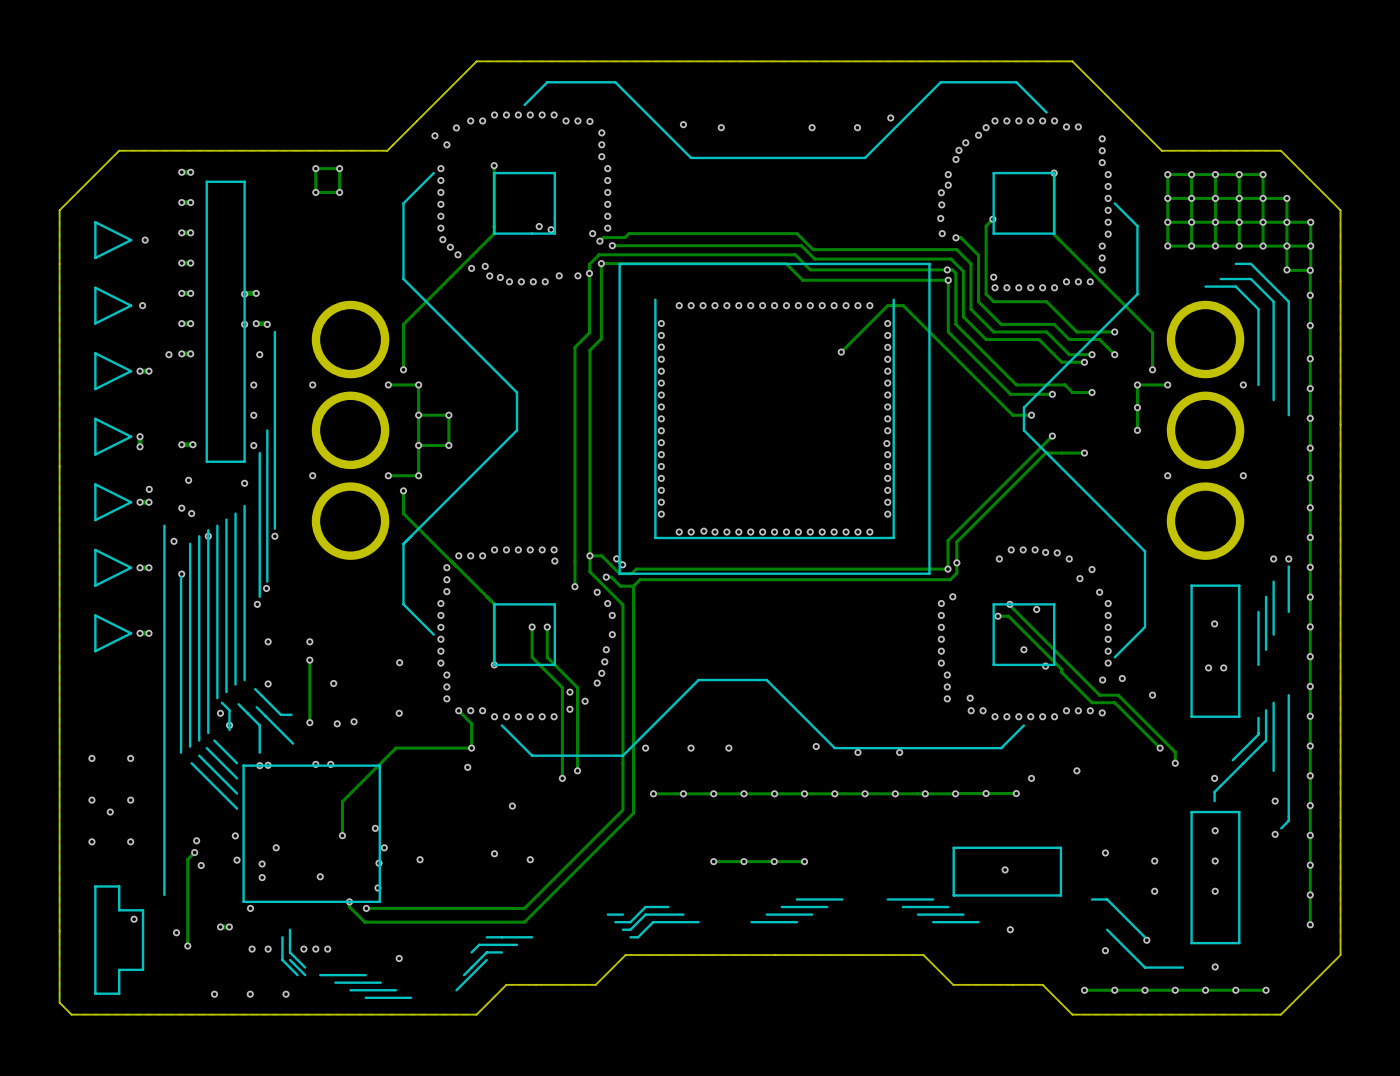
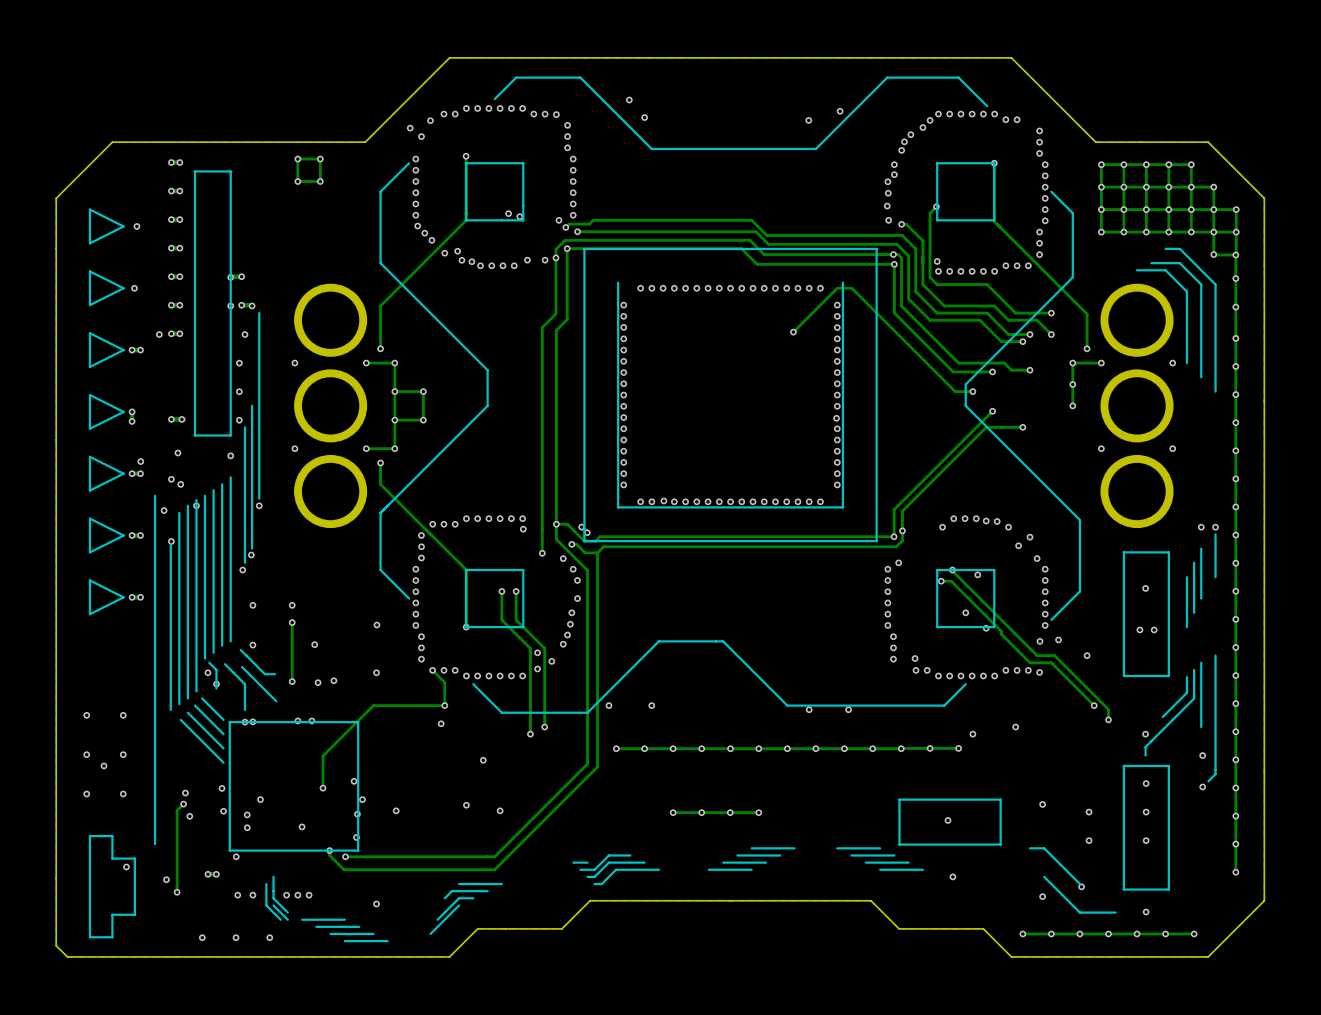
via position: (721, 127) -> (629, 100)
via: (812, 127) -> none
via: (816, 746) -> none
via: (728, 748) -> none

